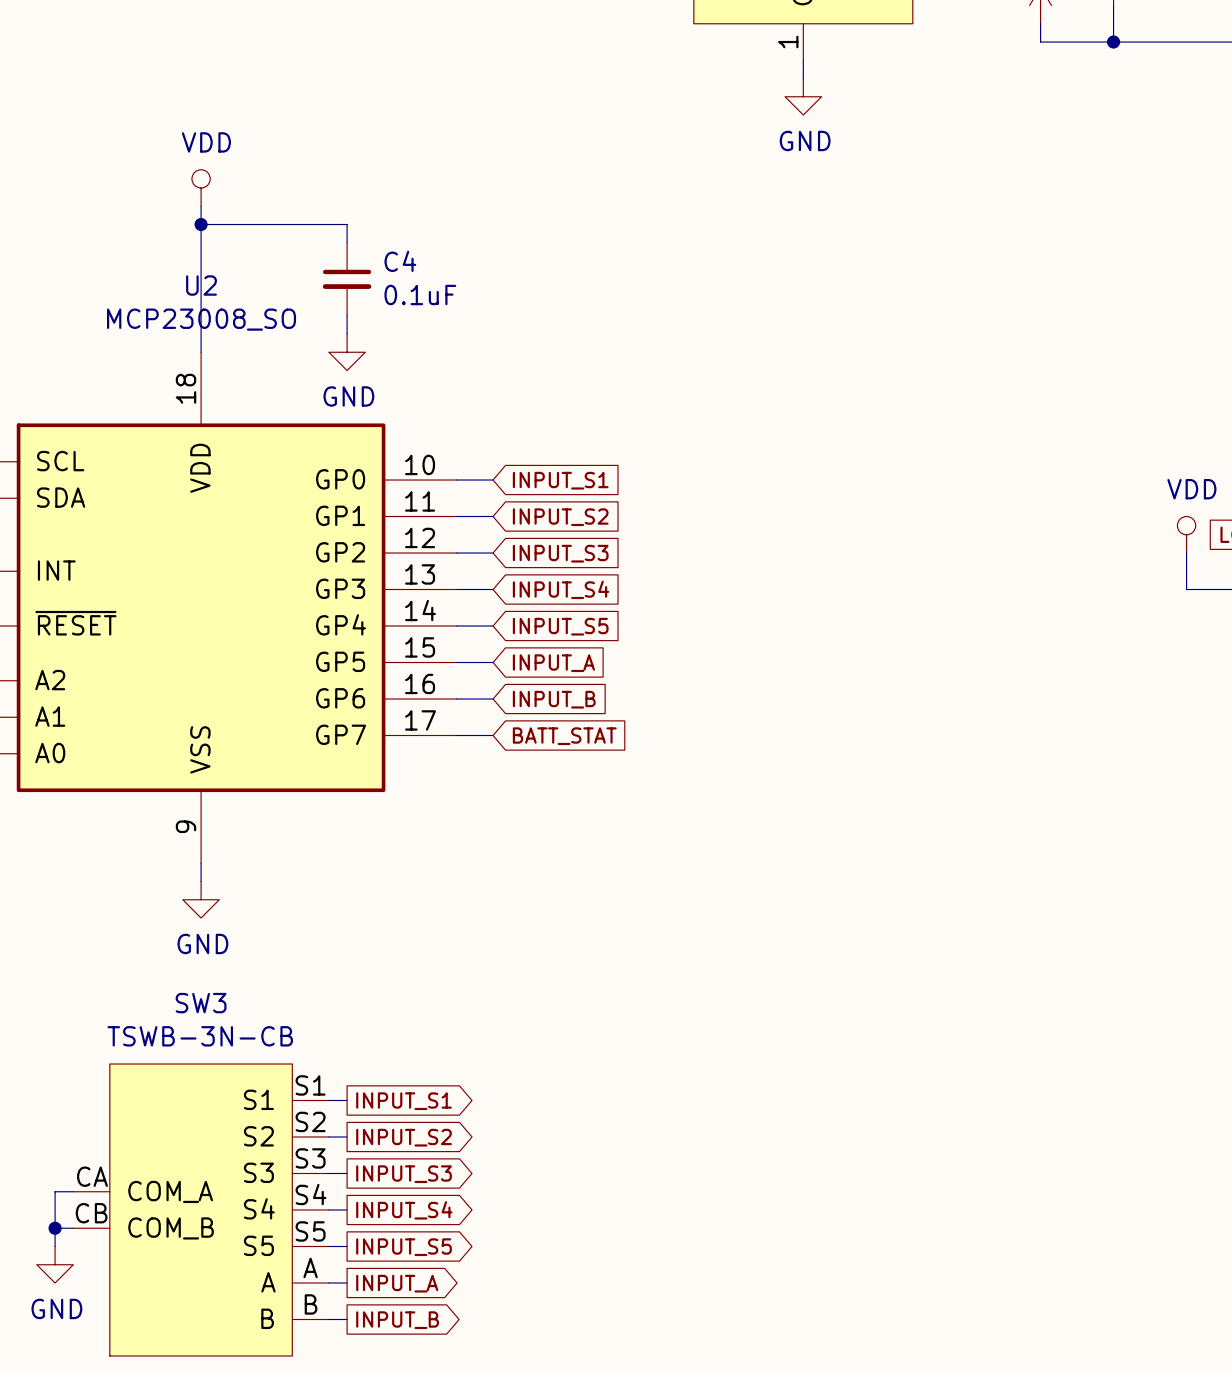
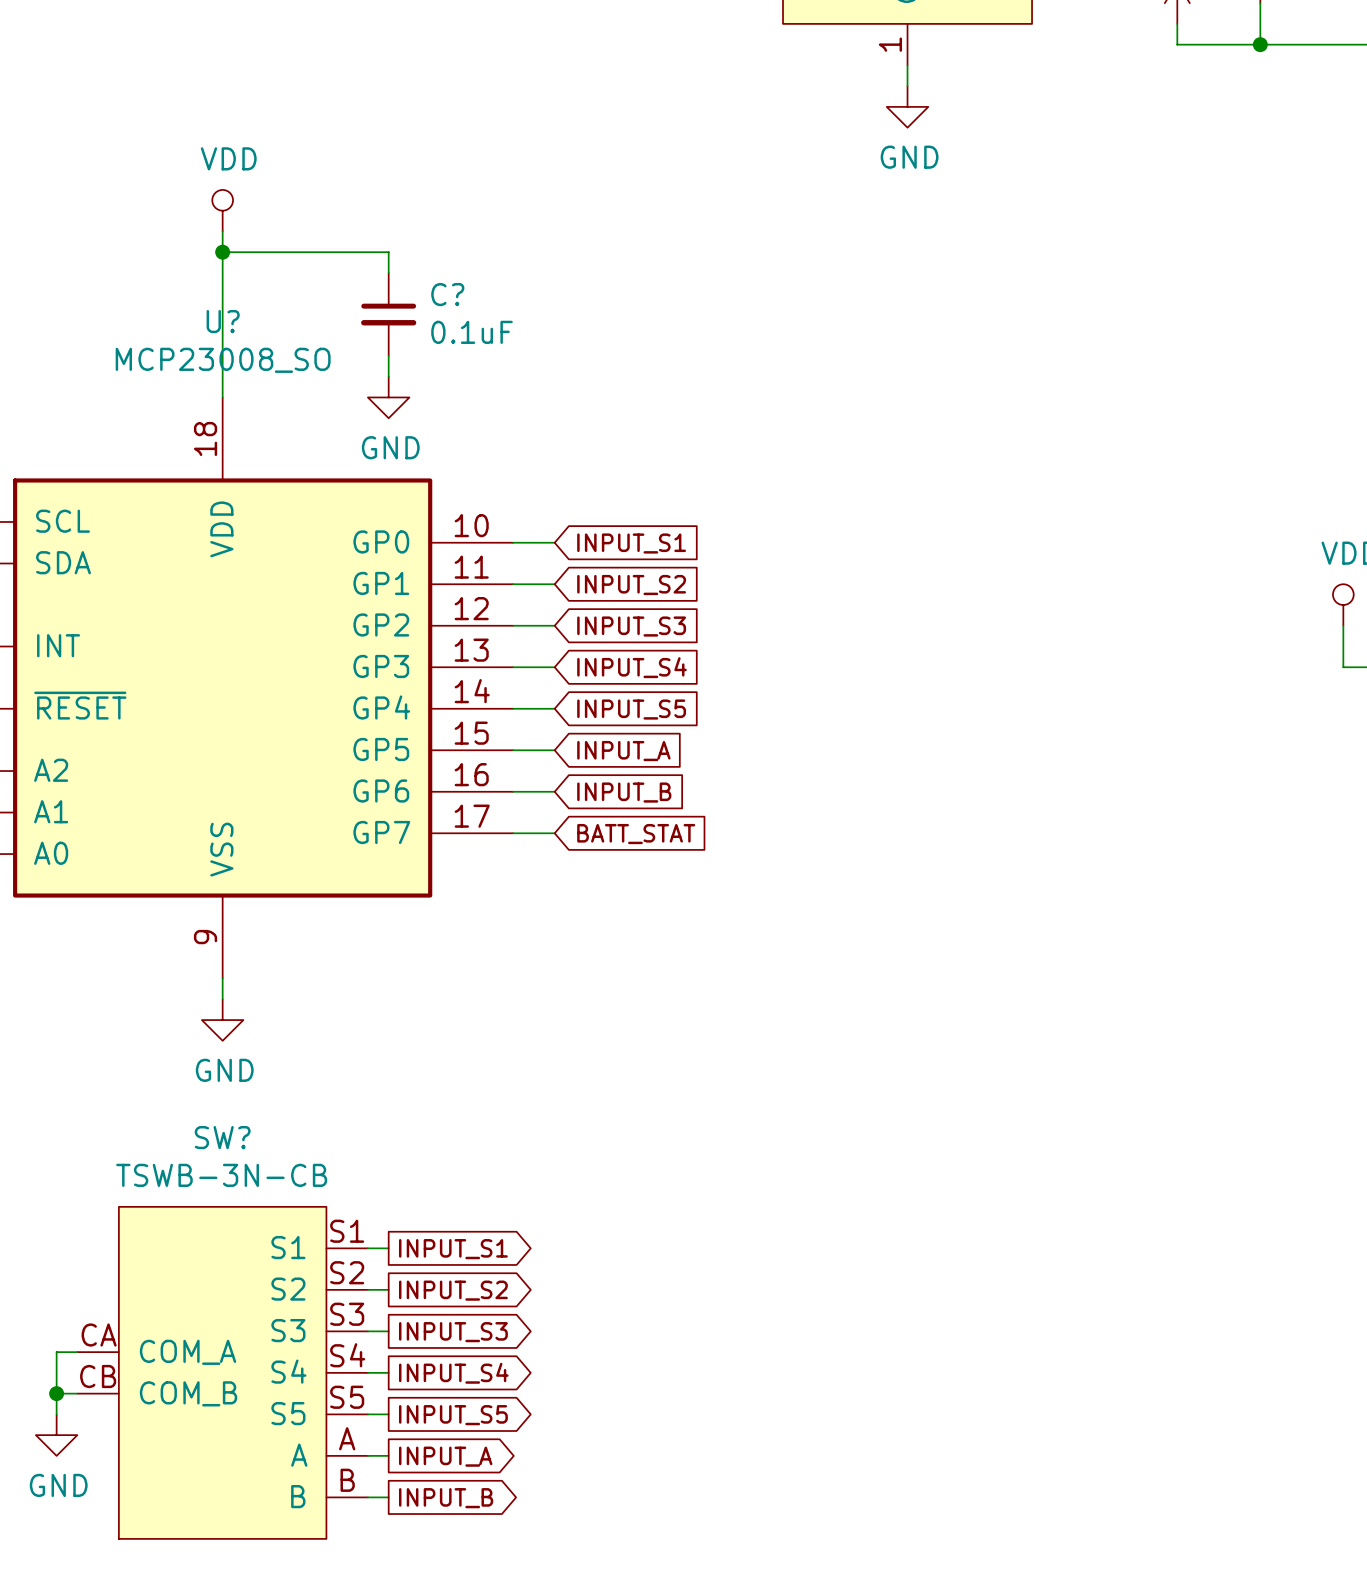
C4 name: C4 (400, 261) -> C? (447, 294)
U2 name: U2 (201, 285) -> U? (223, 321)
SW3 name: SW3 (201, 1003) -> SW? (222, 1137)

